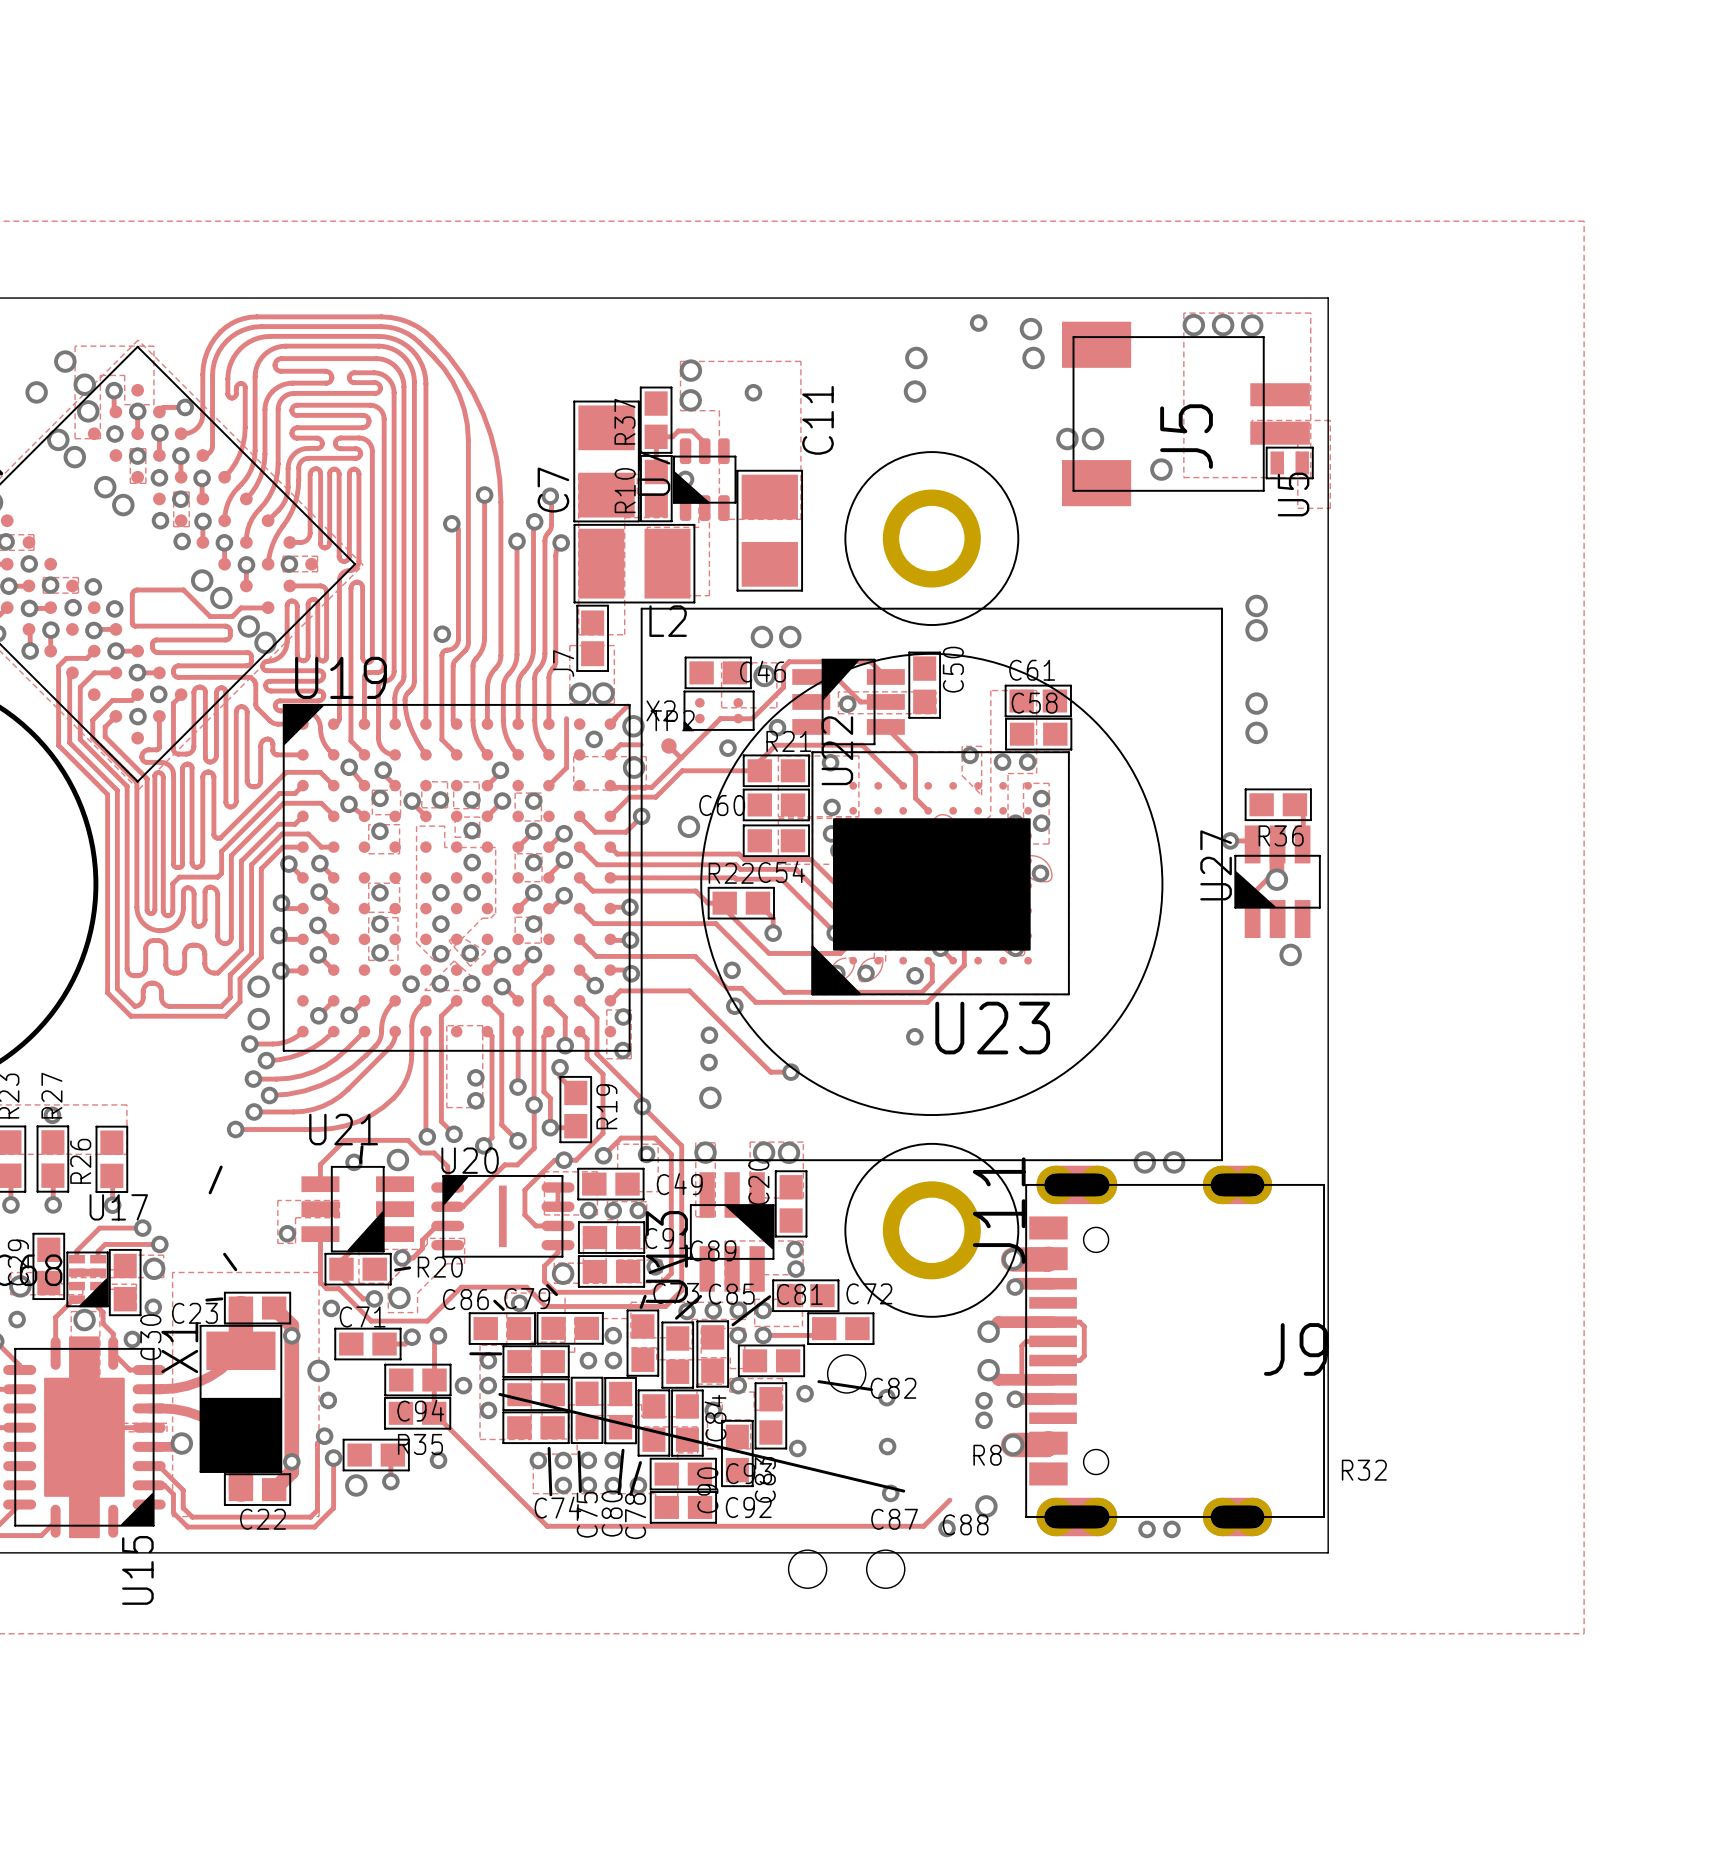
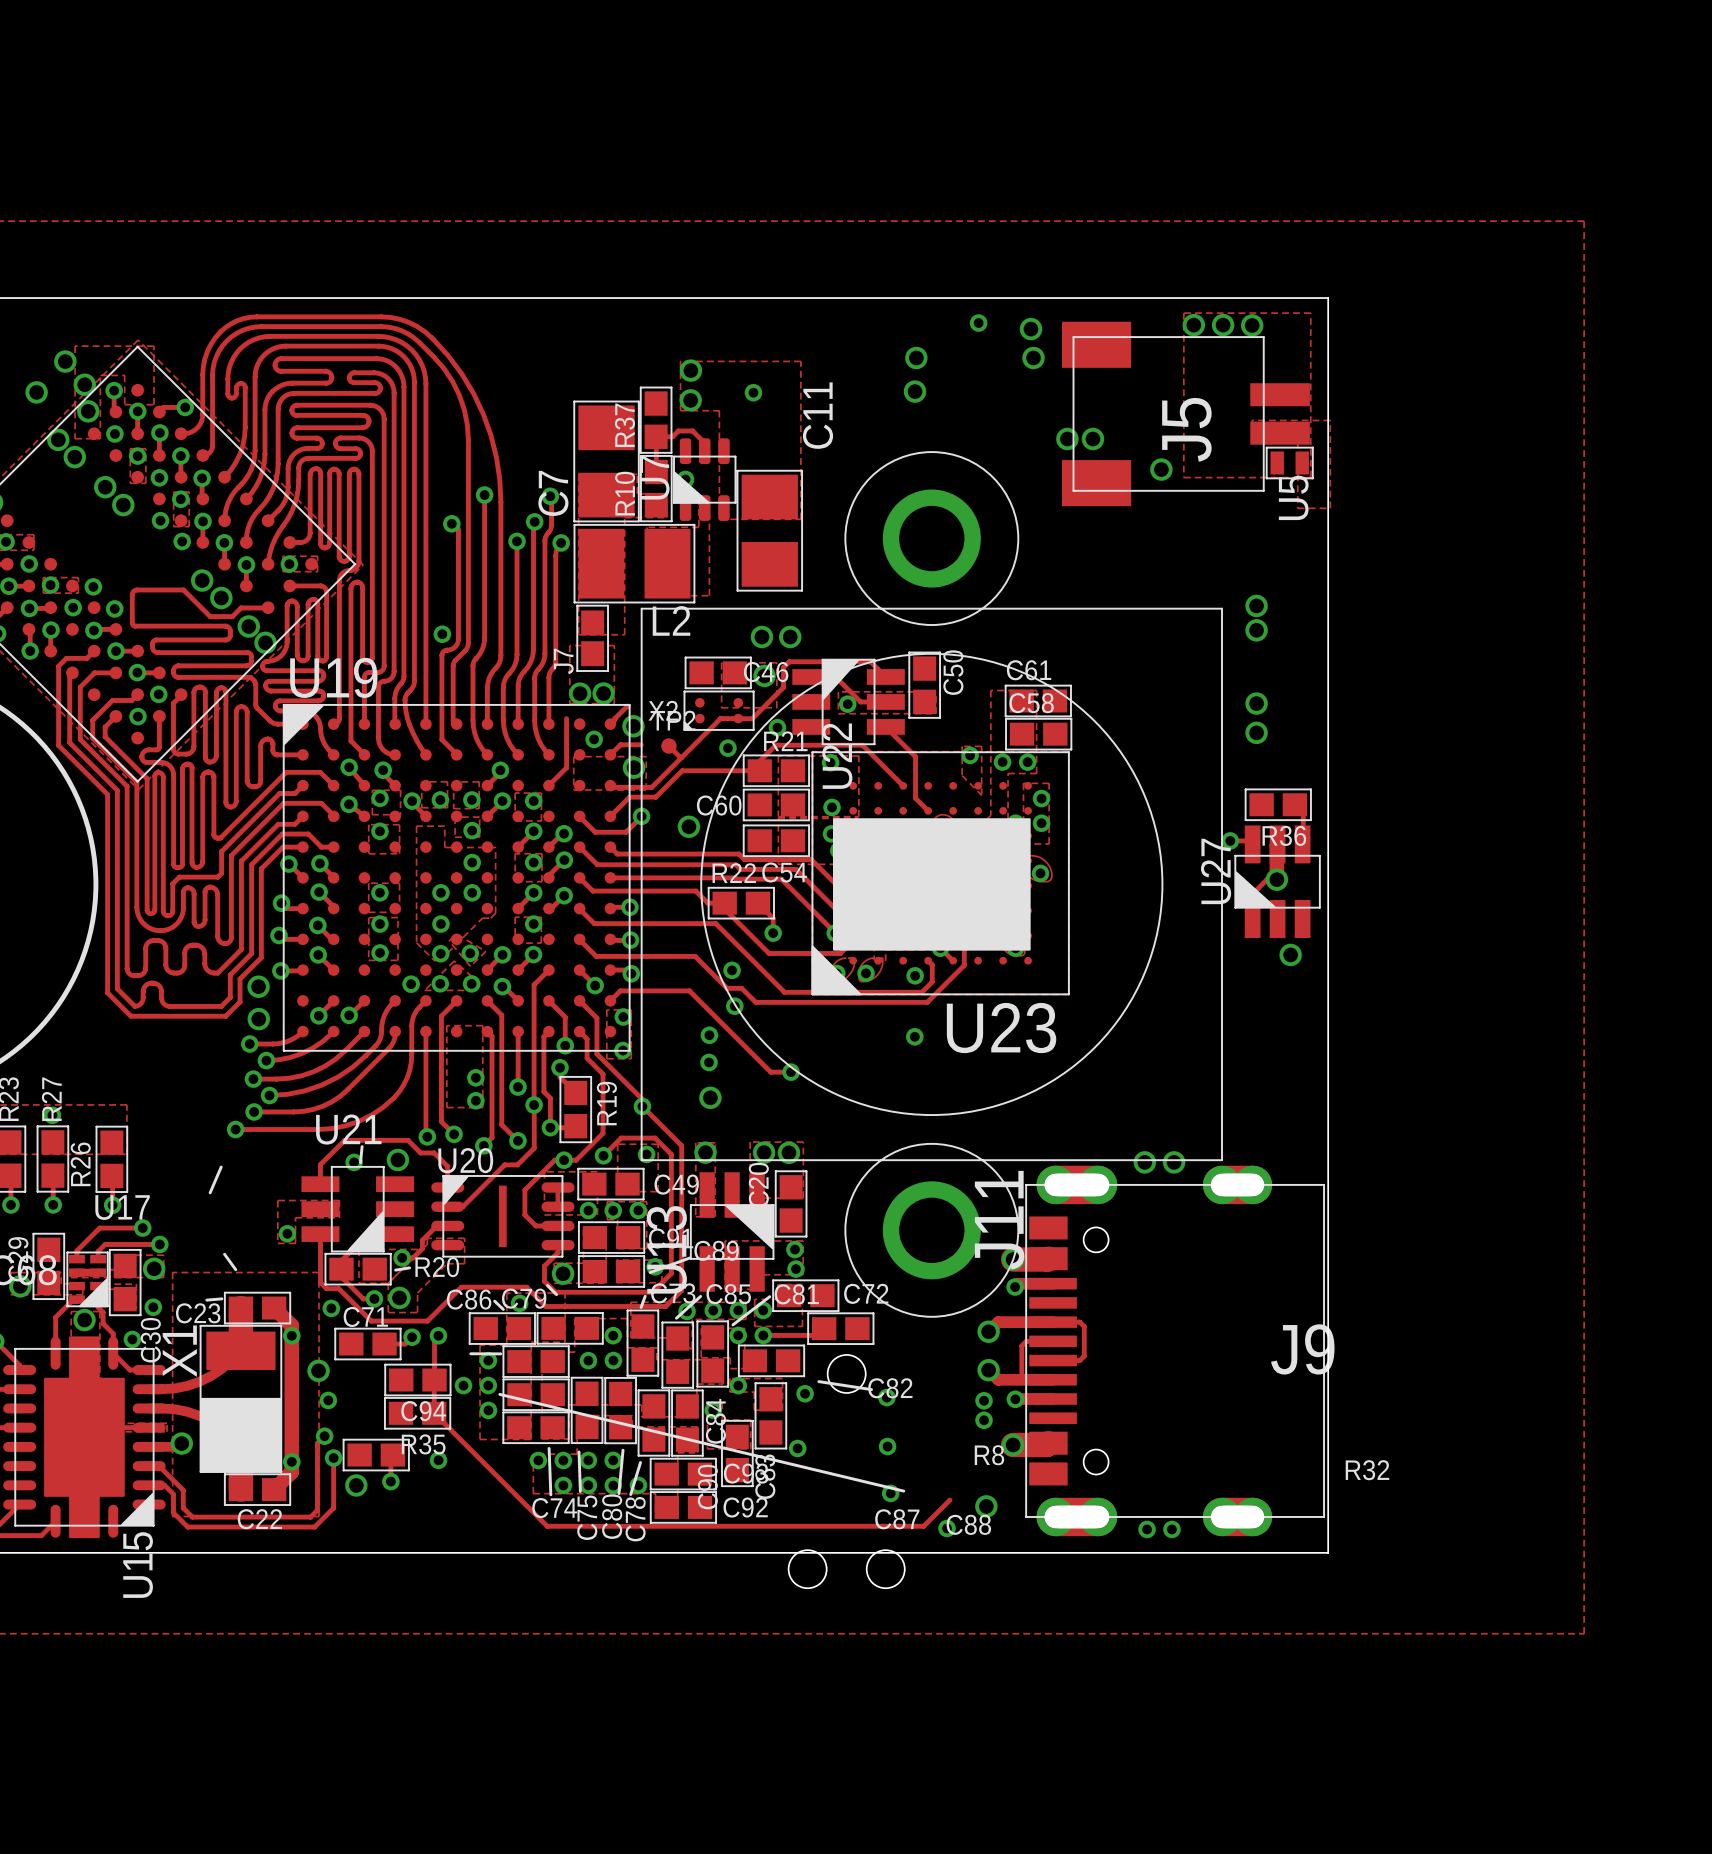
via: (17, 1319) -> none

